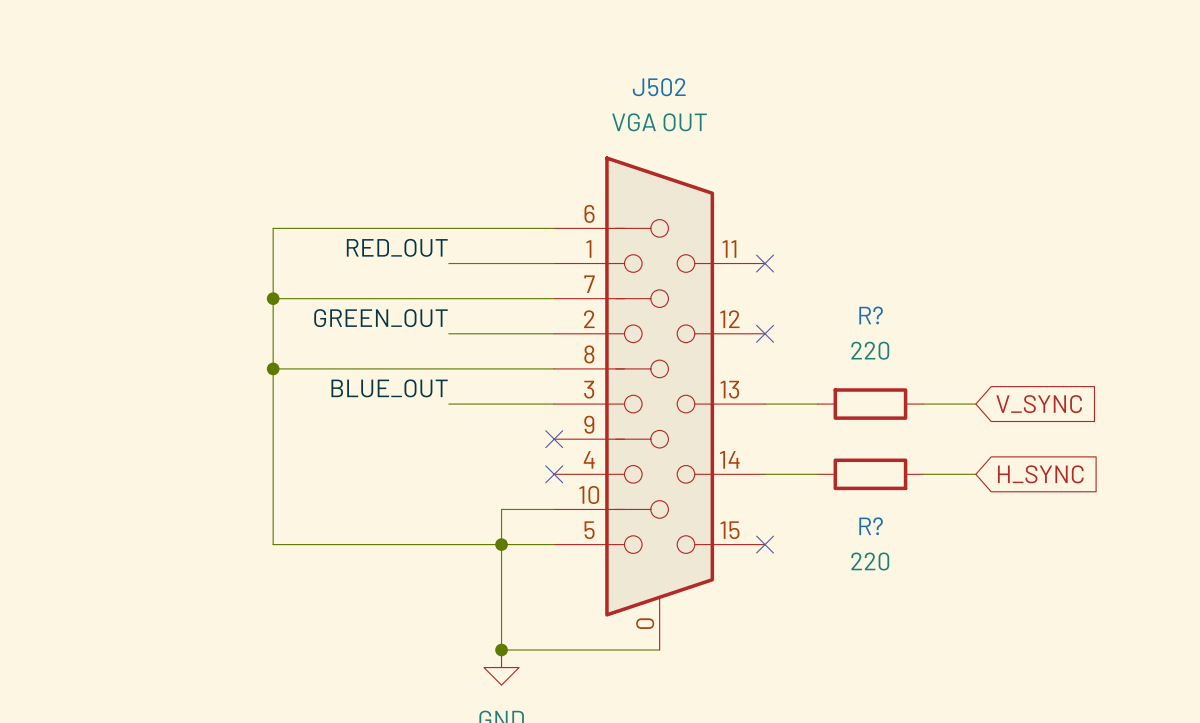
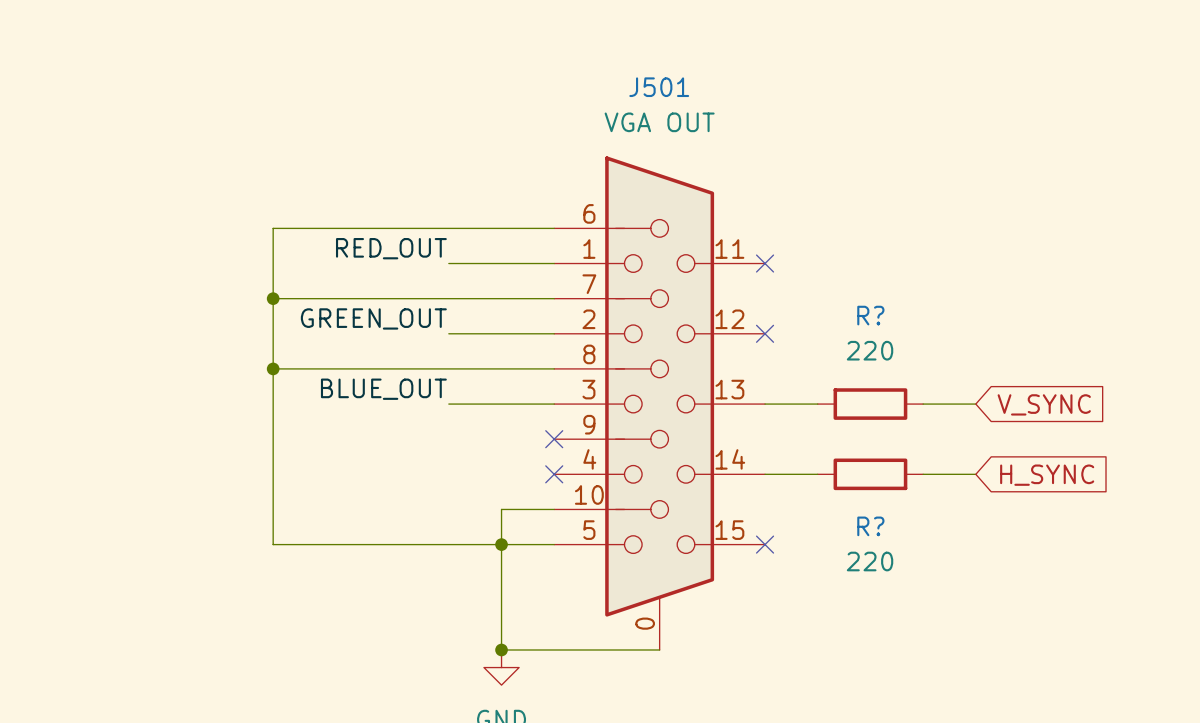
J502 name: J502 (659, 87) -> J501 (659, 87)

